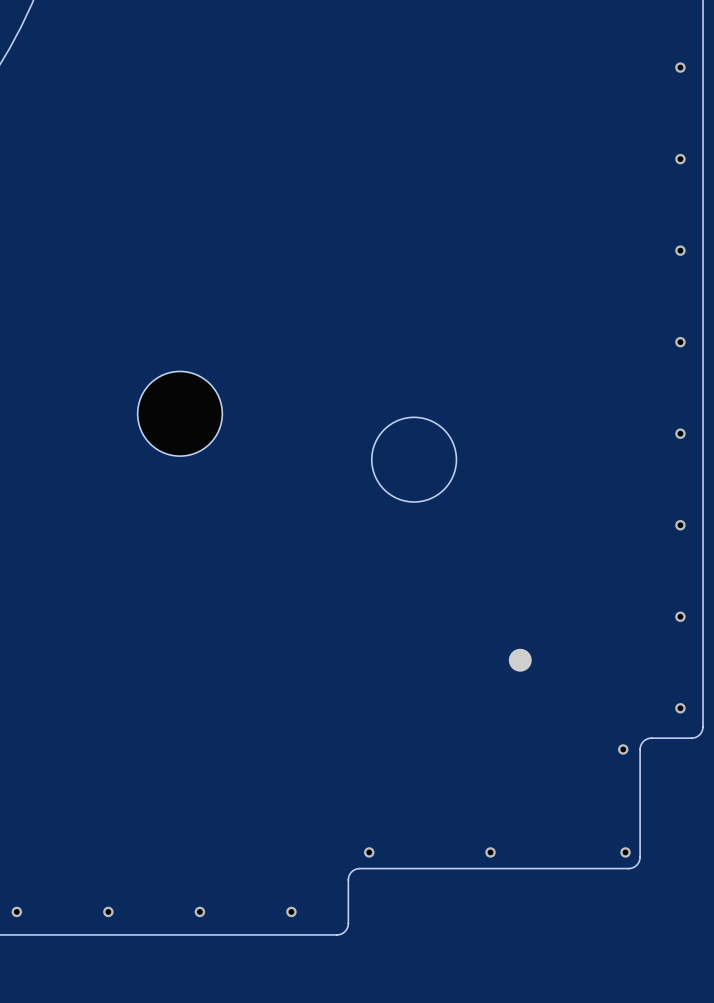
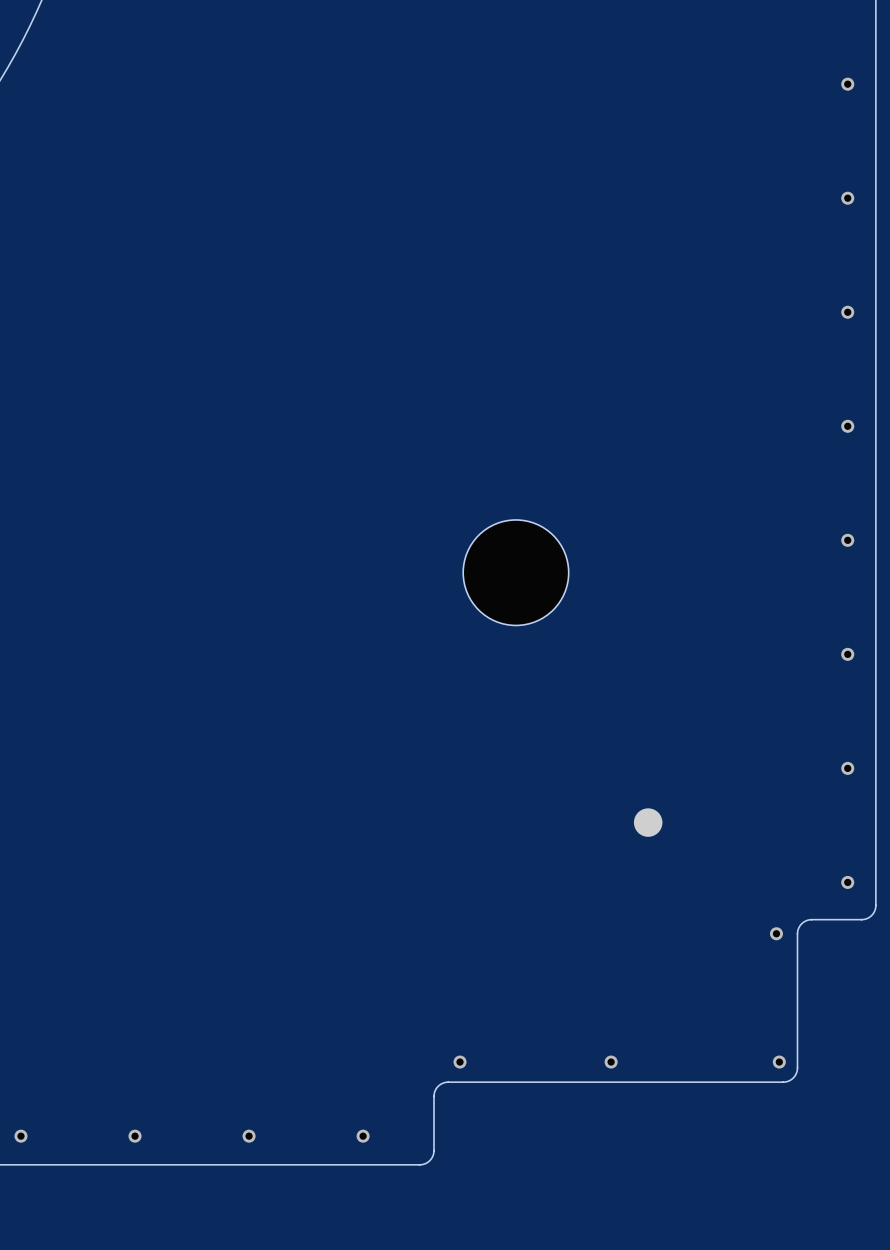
part position: (180, 413) -> (515, 572)
round board edge: [371, 417, 457, 503] -> none

